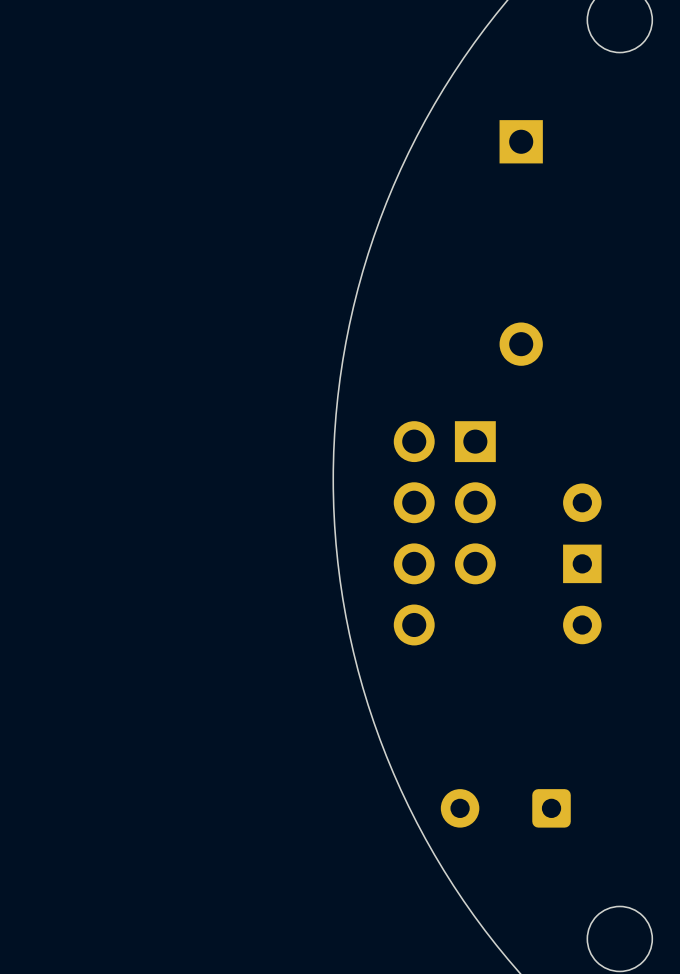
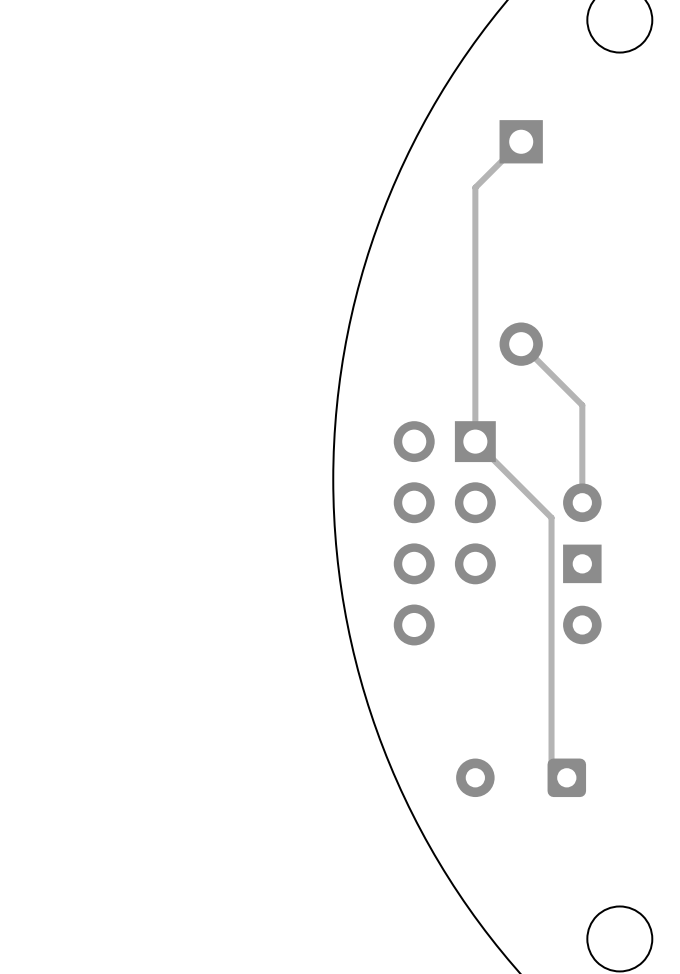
track: none -> (521, 141) (475, 187) (475, 441) (551, 517) (551, 762) (566, 777)
track: none -> (521, 344) (582, 405) (582, 502)
part position: (505, 808) -> (521, 777)

